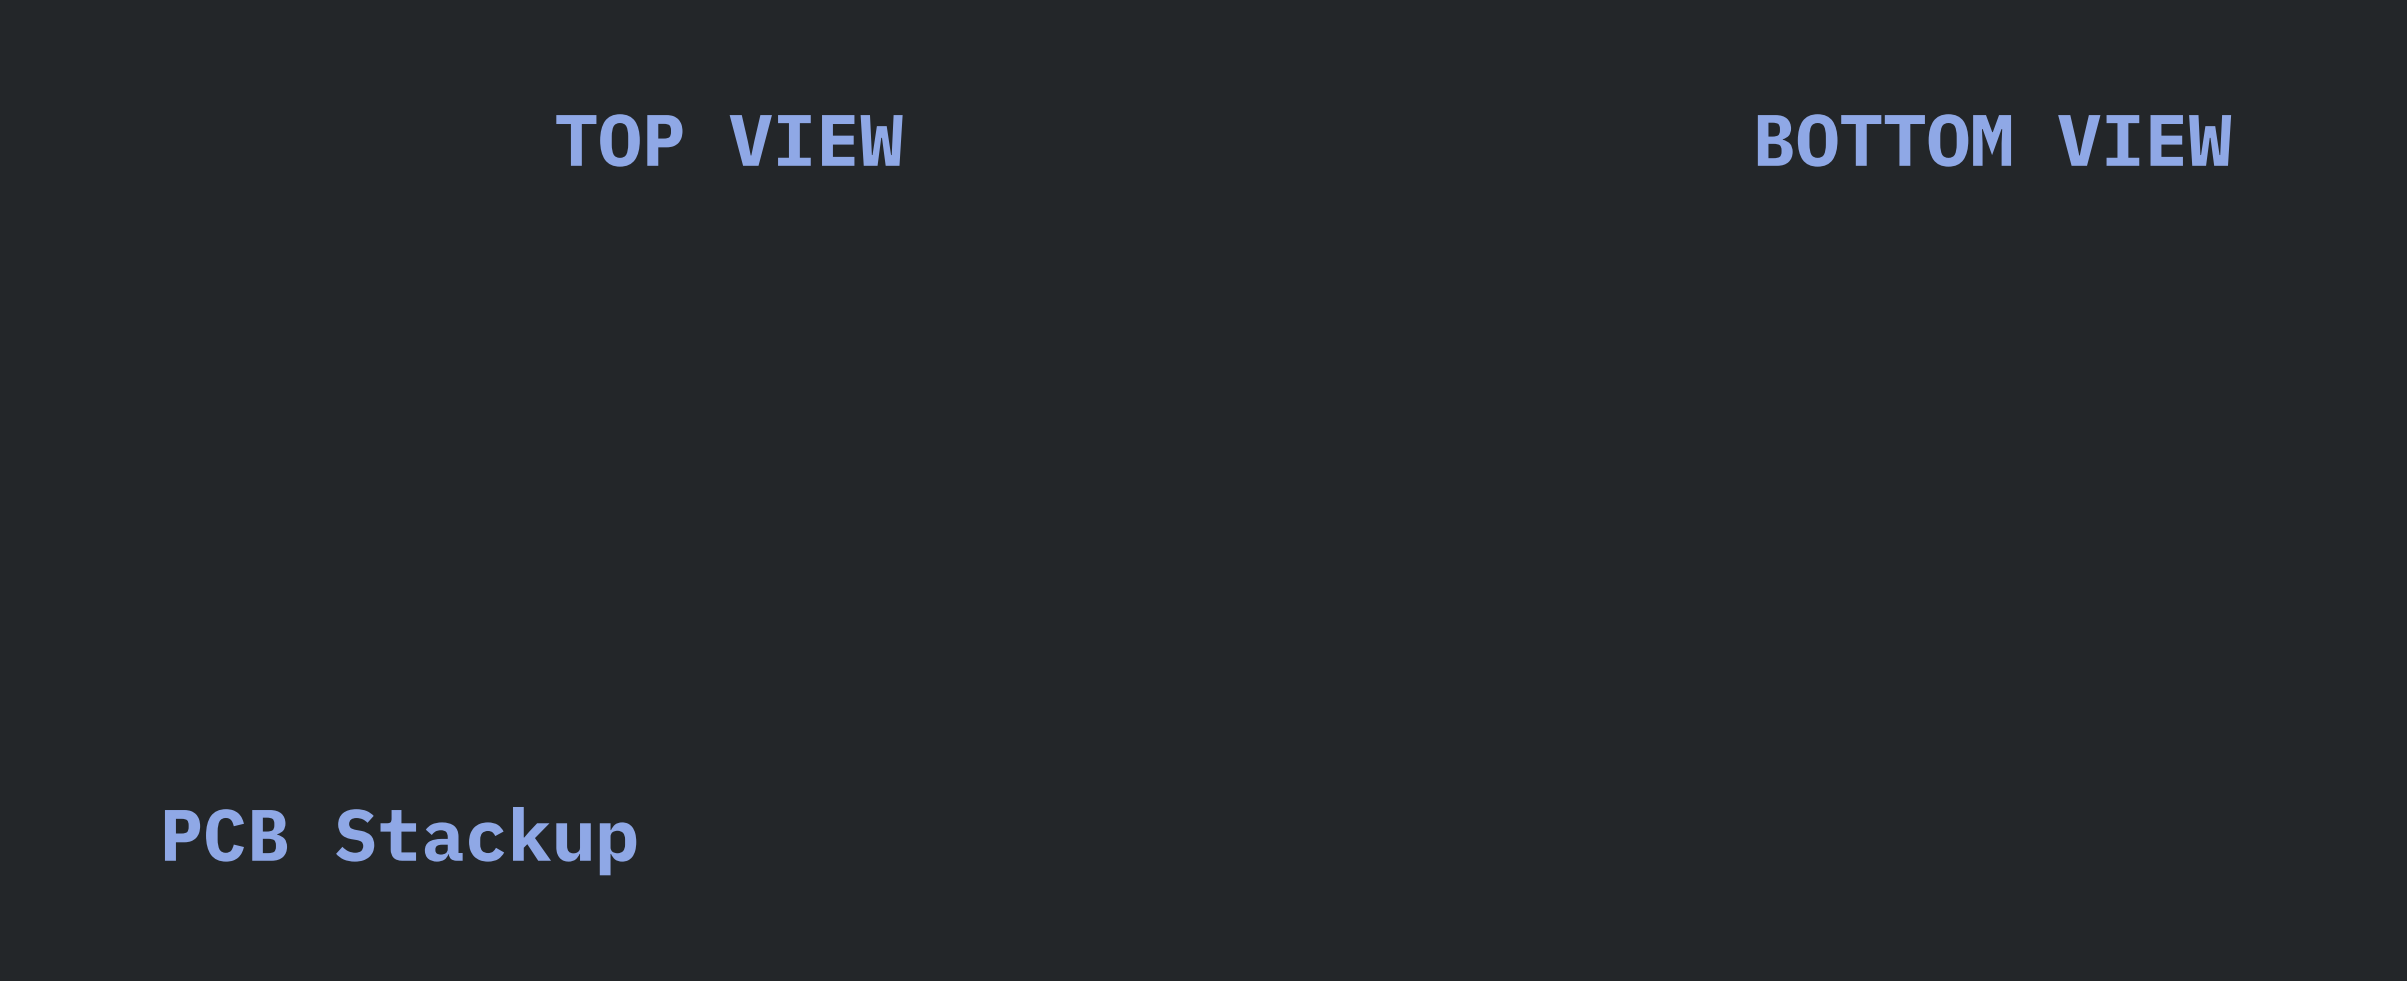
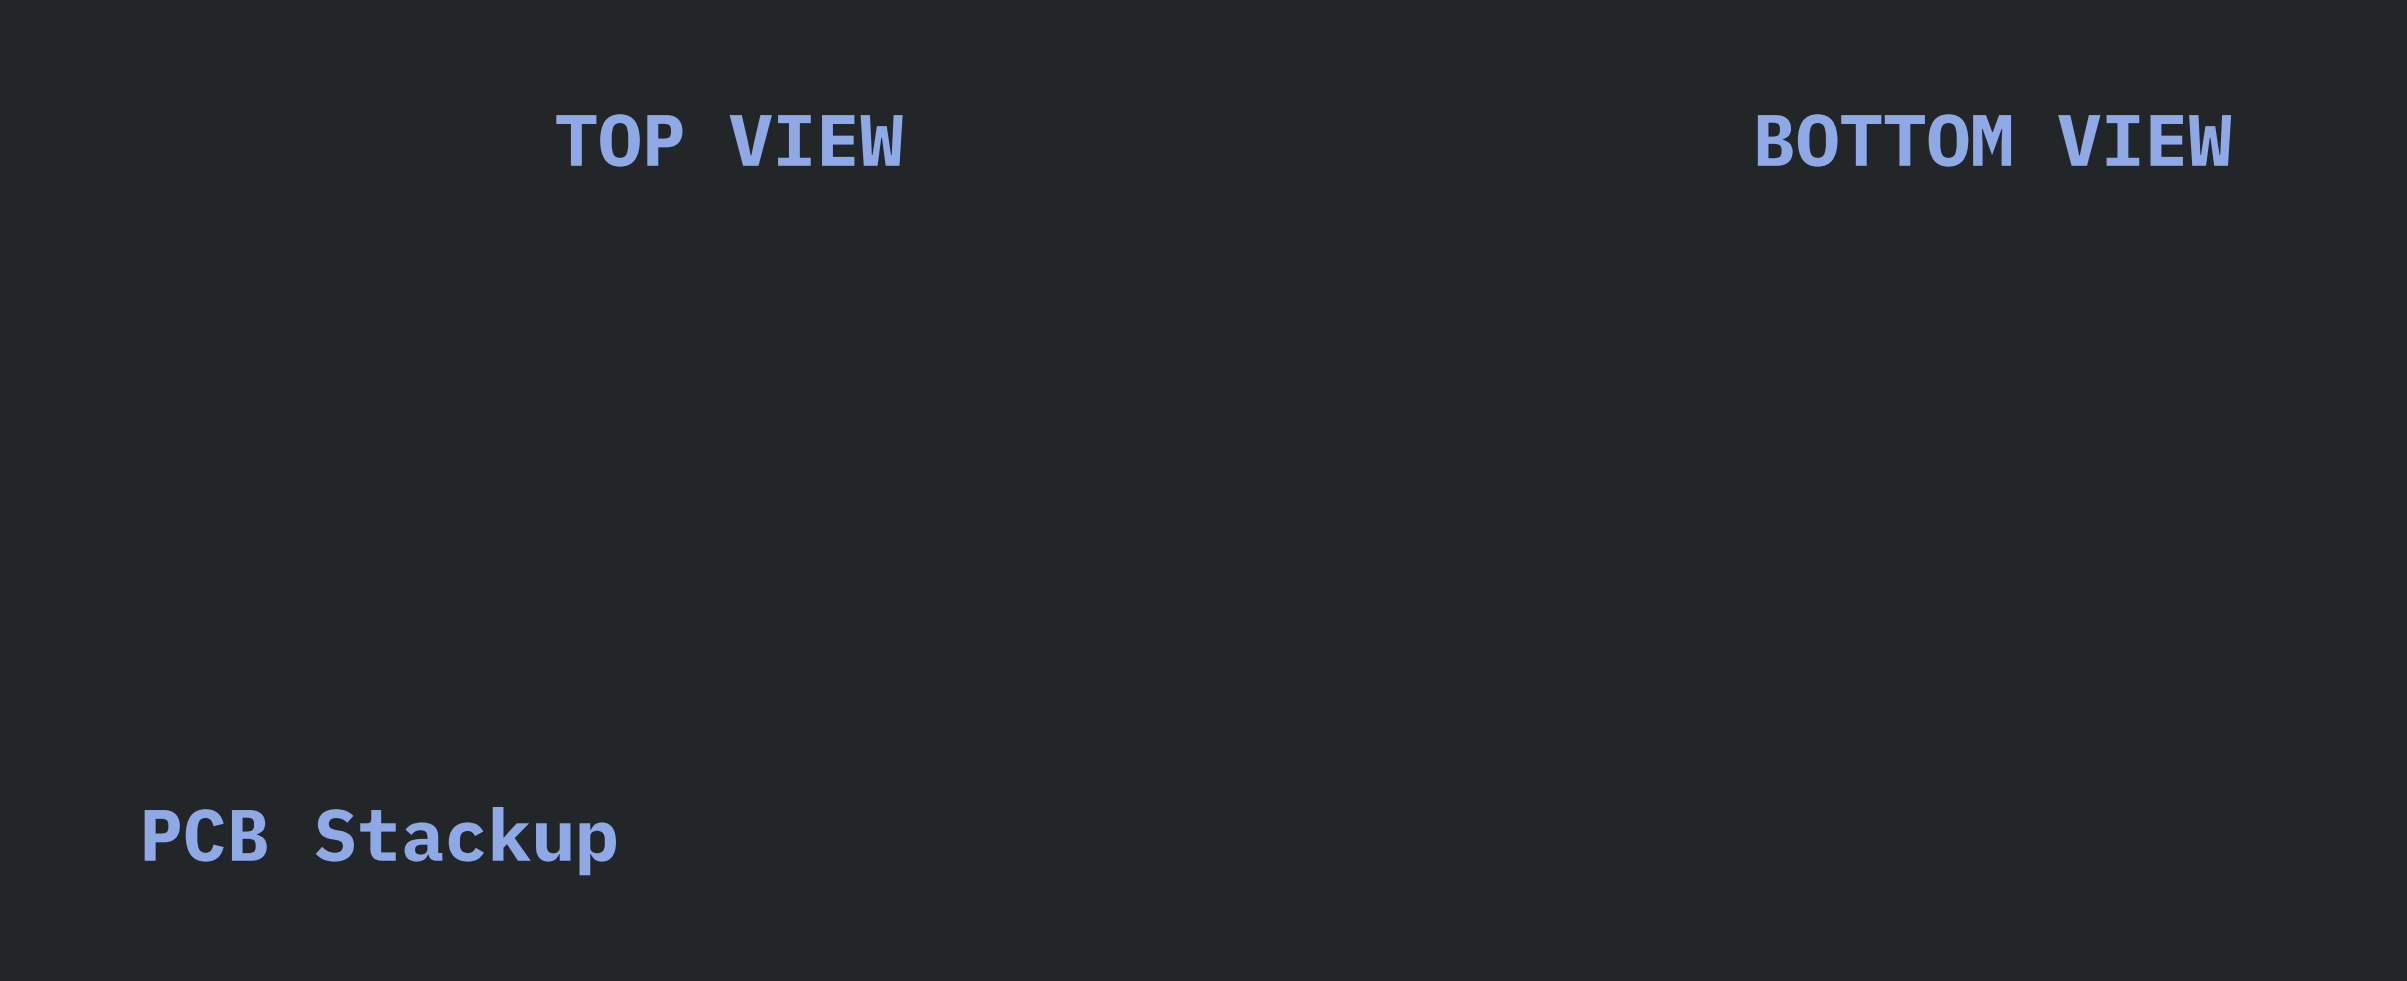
text position: PCB Stackup (400, 841) -> PCB Stackup (380, 841)

